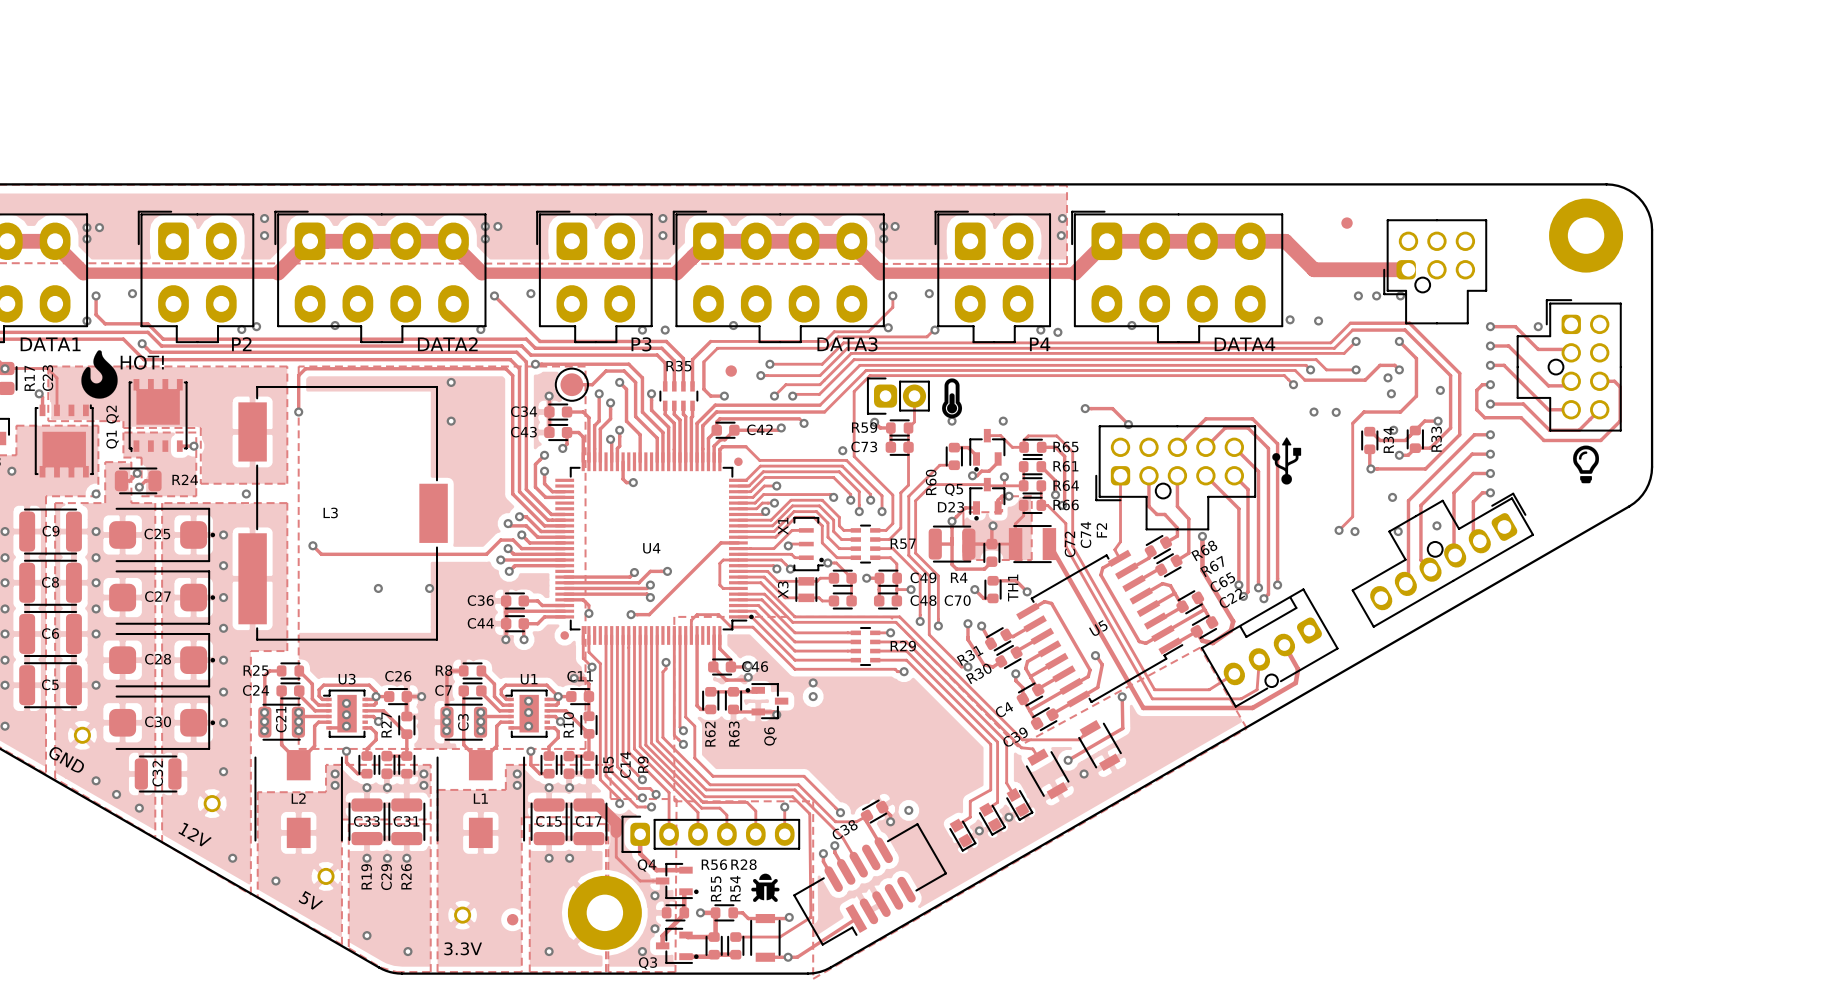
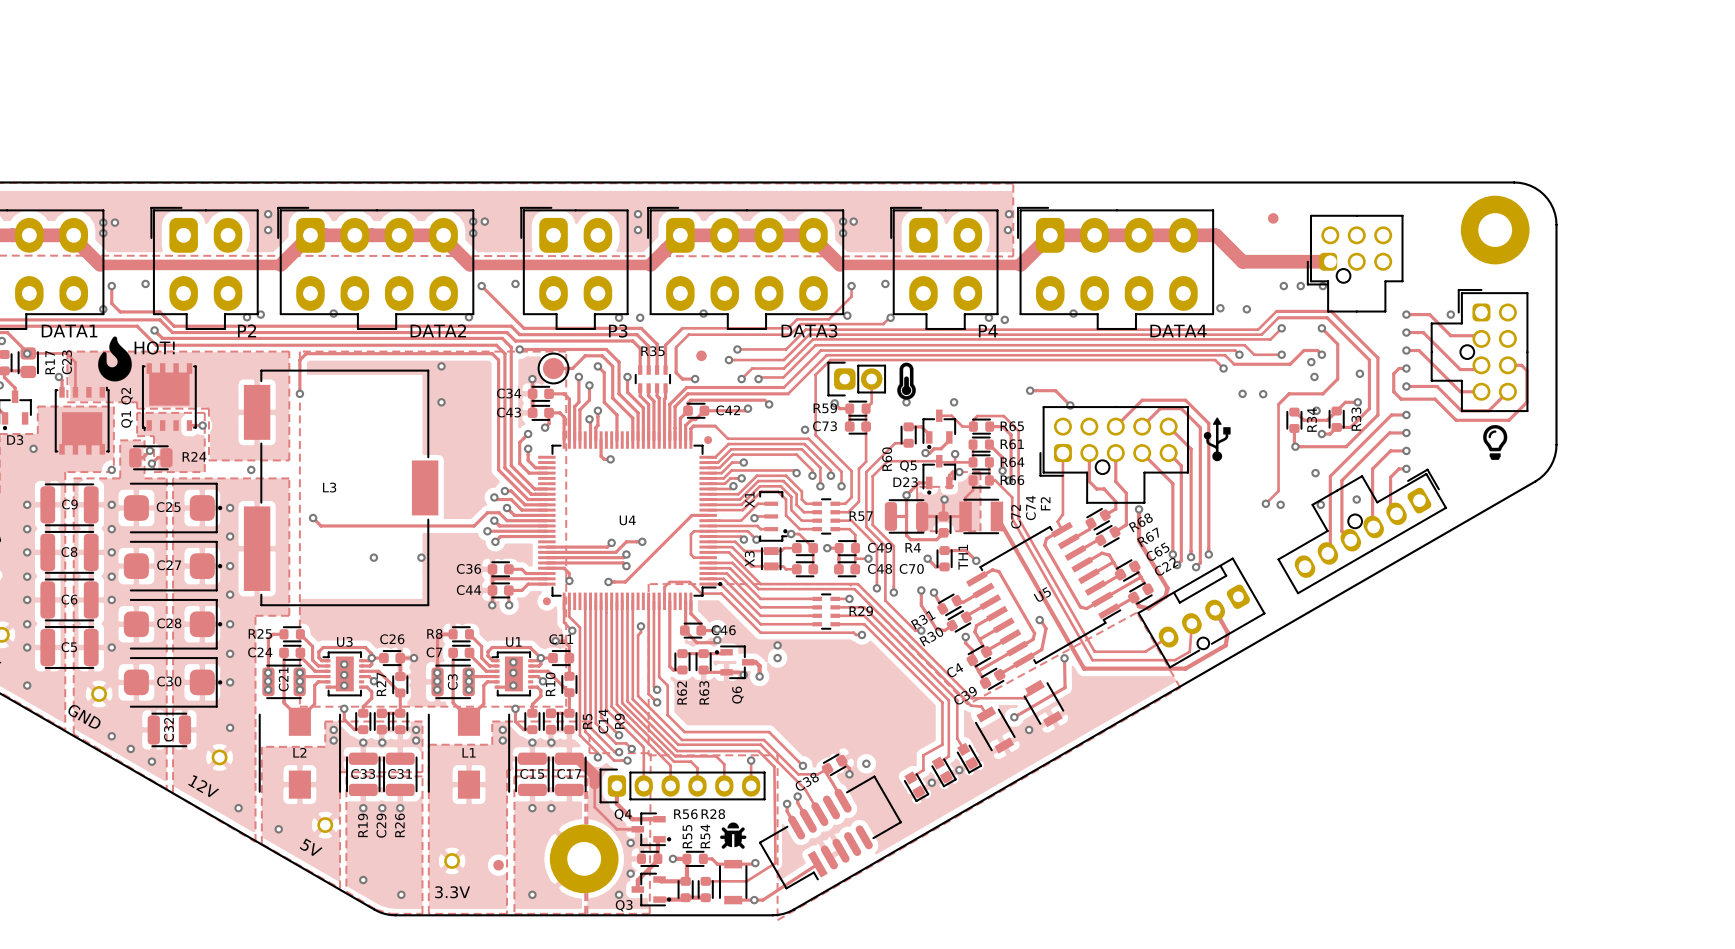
track: none -> (748, 662) (755, 662) (759, 666) (759, 676)
via: none -> (759, 676)

